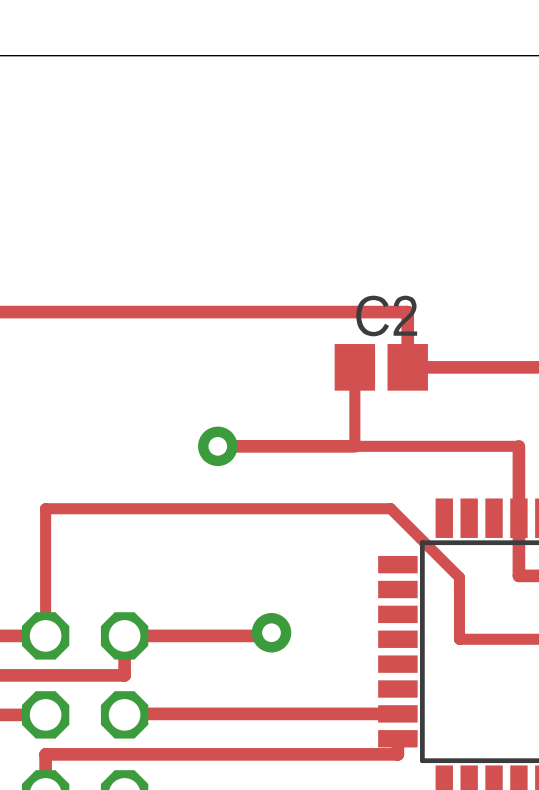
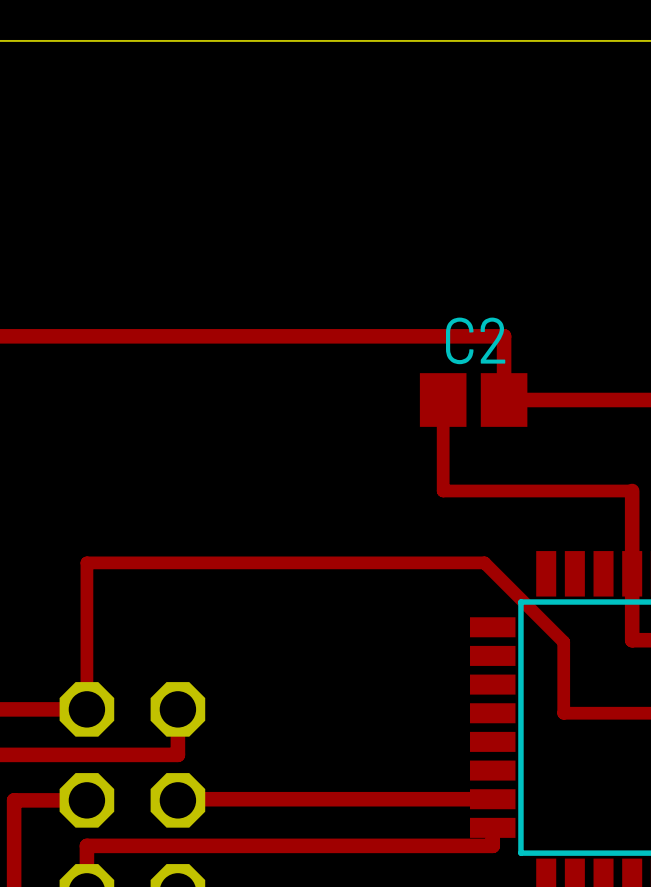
track: (217, 446) (354, 446) -> none
via: (217, 446) -> none
track: (271, 632) (271, 635) (124, 635) -> none
via: (271, 632) -> none

